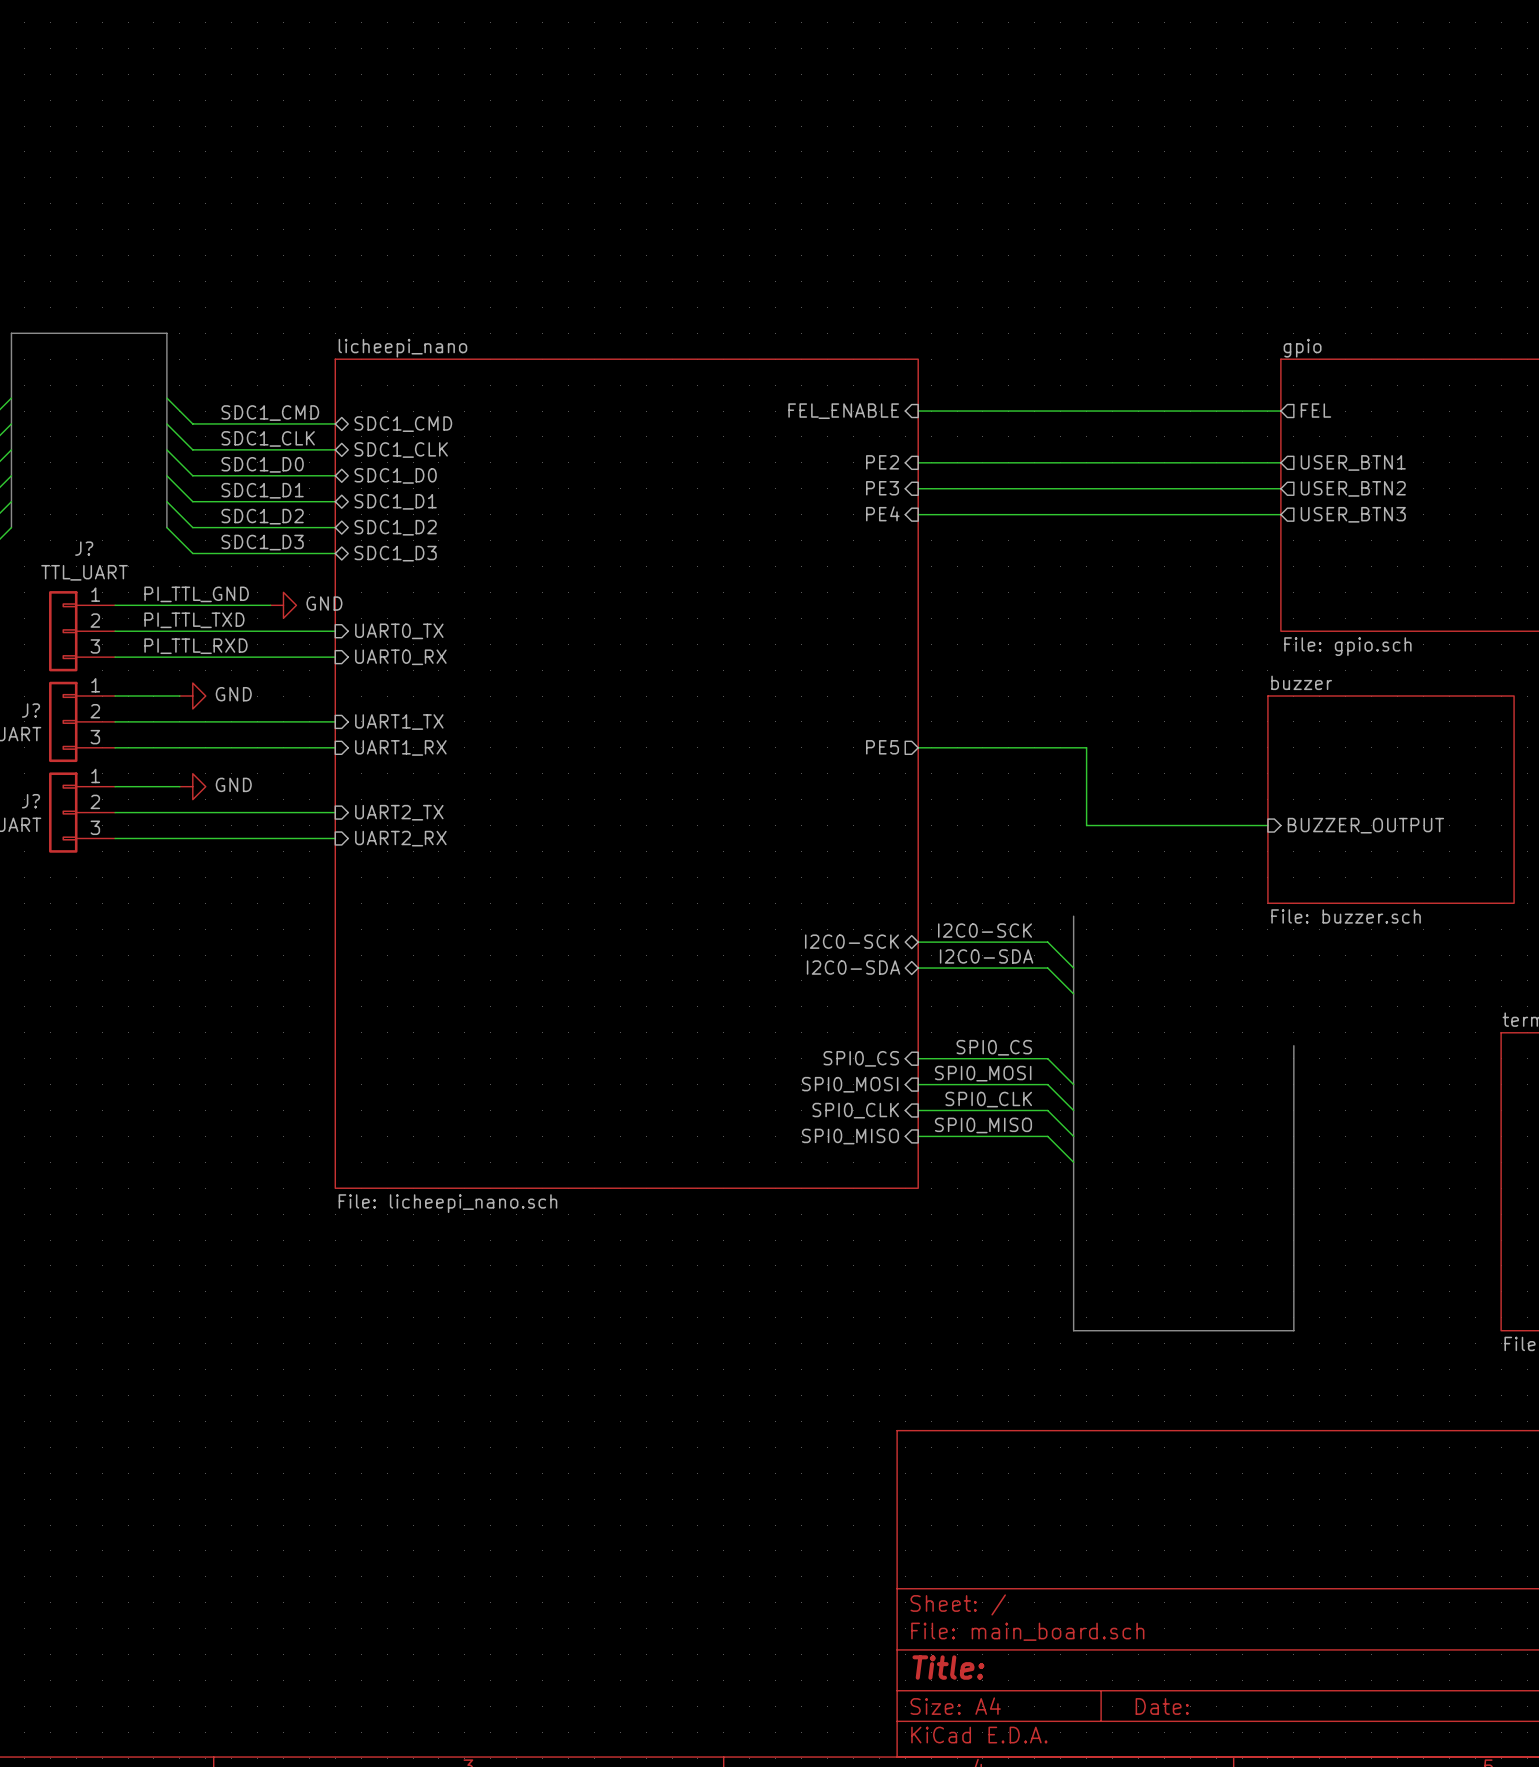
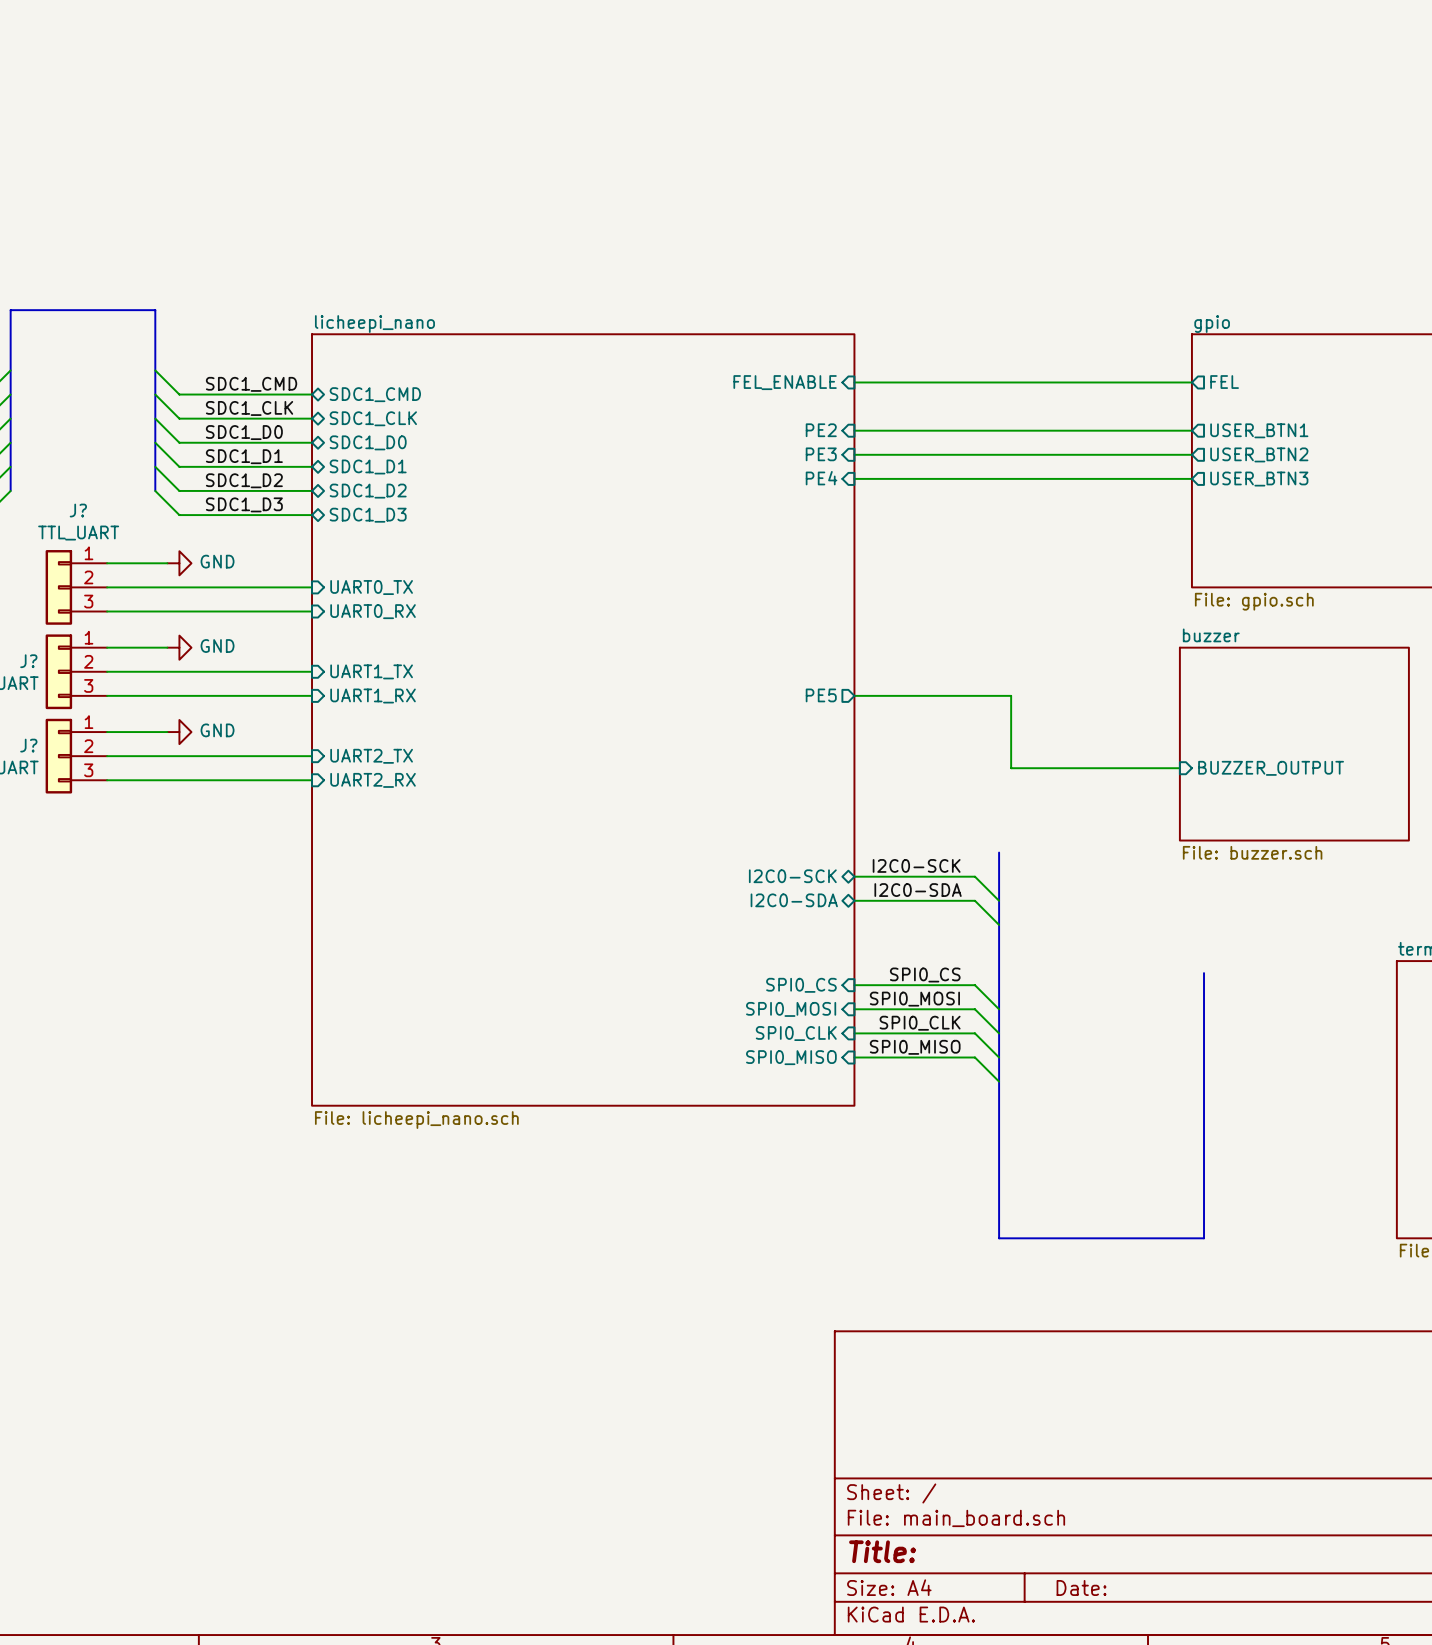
label: PI_TTL_GND (196, 594) -> none
wire: (179, 605) (270, 605) -> none
power symbol position: GND (283, 605) -> GND (179, 563)
label: PI_TTL_TXD (194, 620) -> none
label: PI_TTL_RXD (195, 646) -> none

